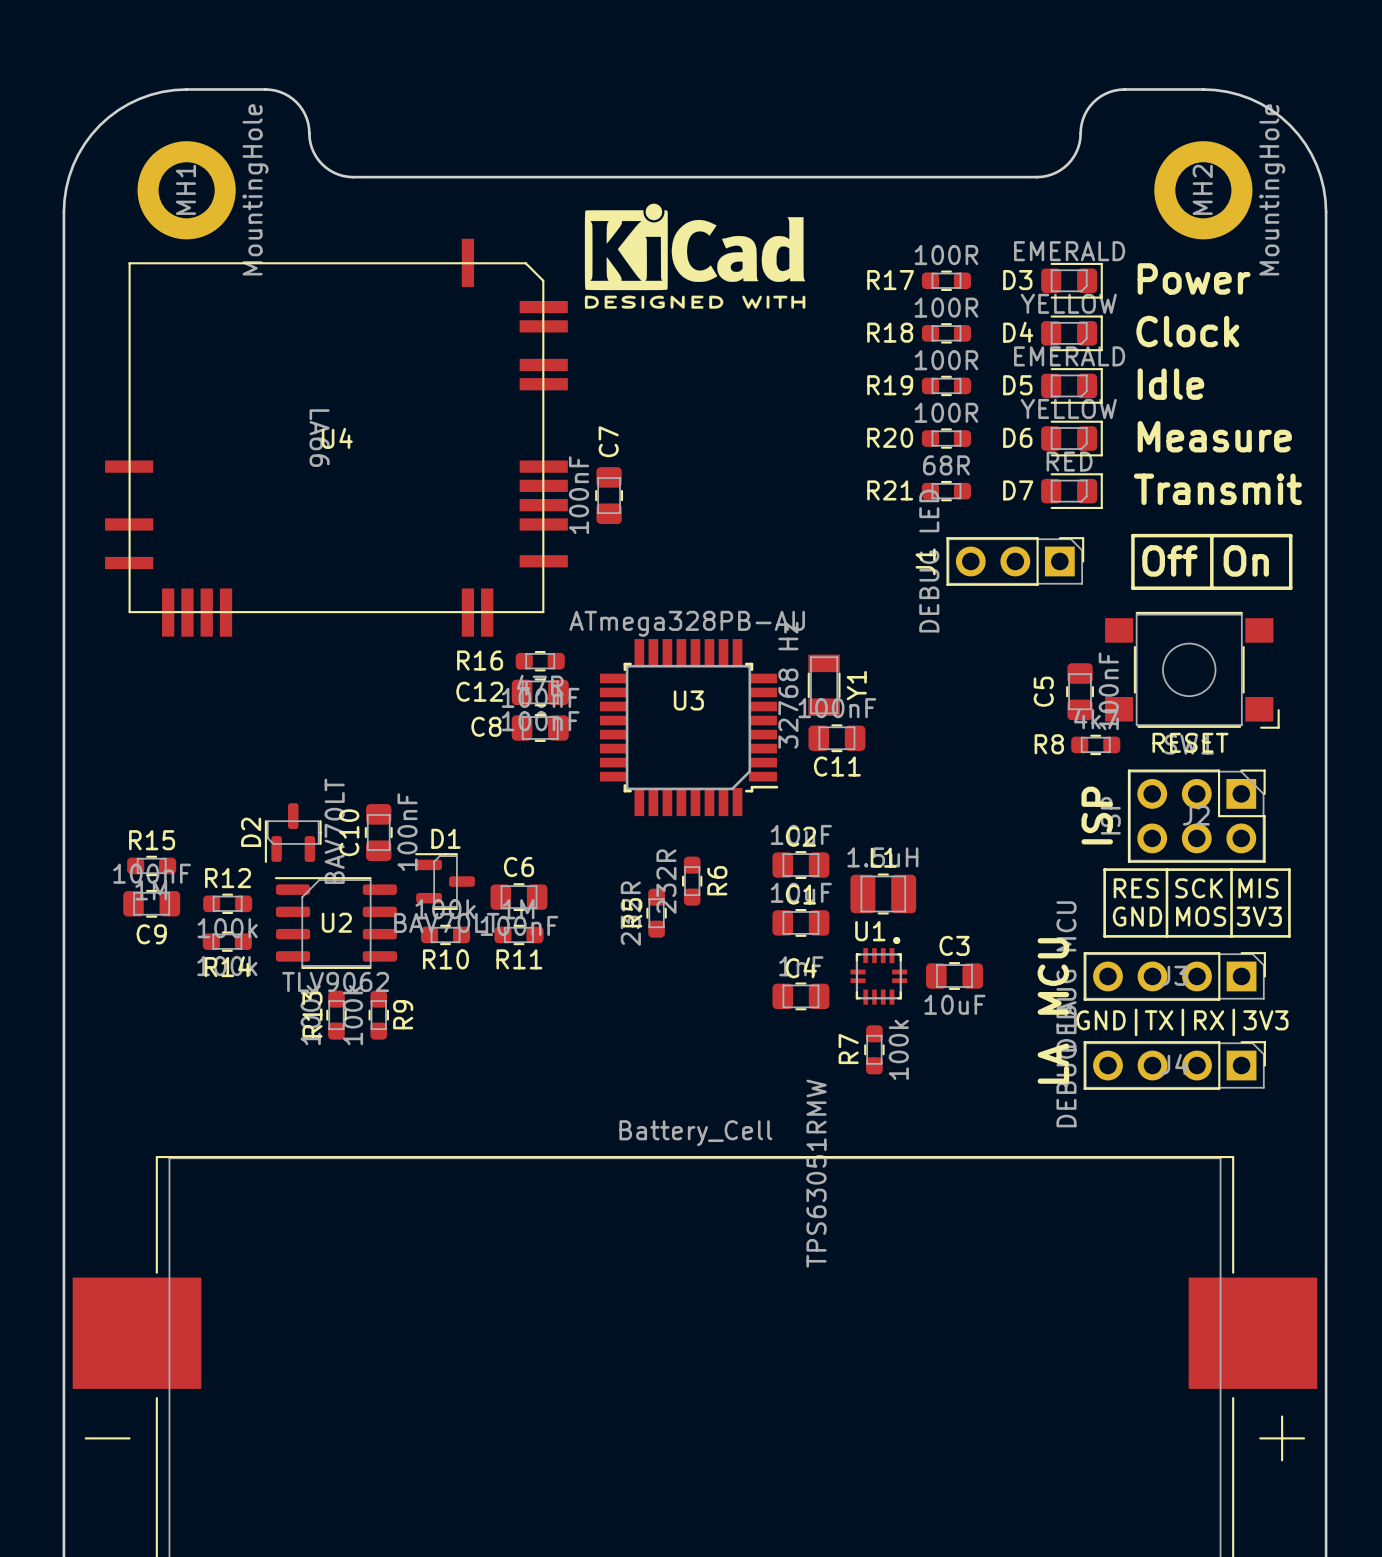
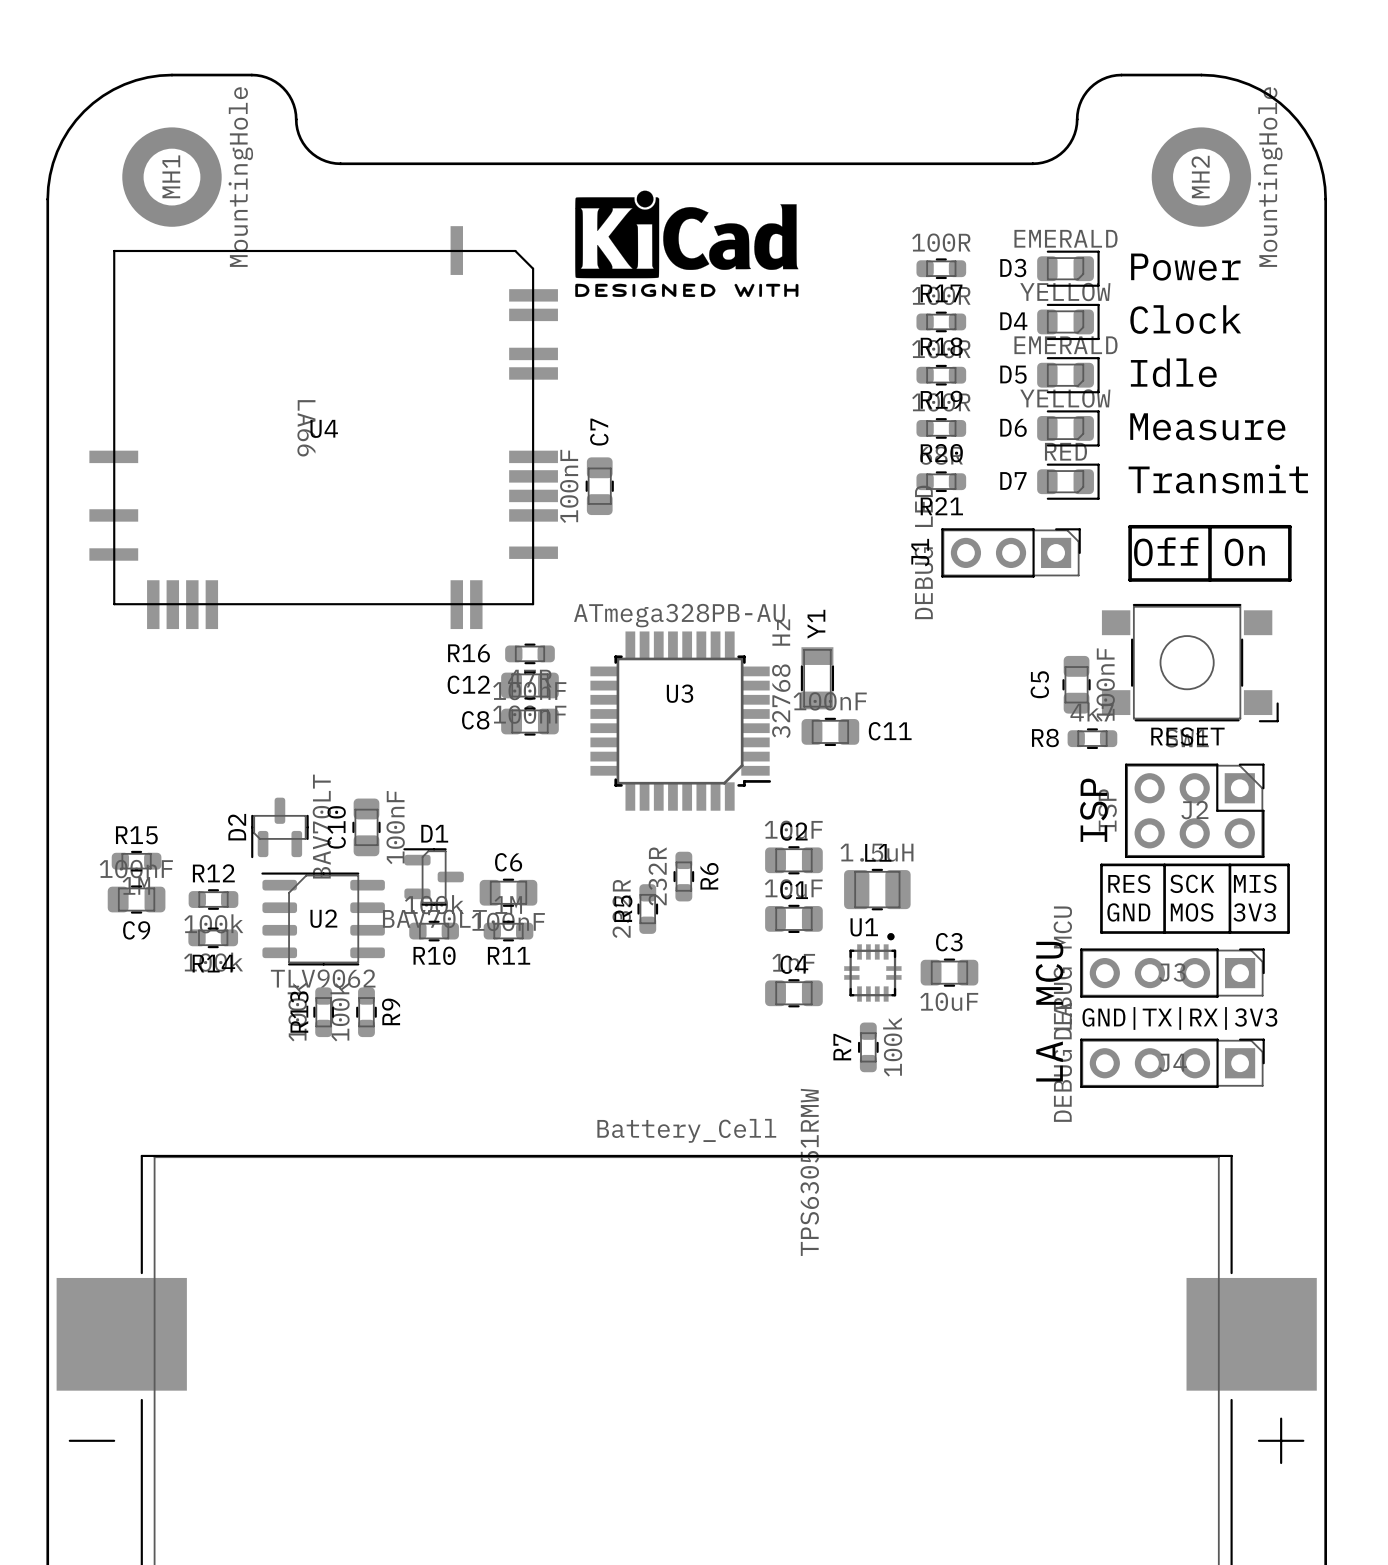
R17 name position: R17 (890, 280) -> R17 (941, 293)
R18 name position: R18 (890, 332) -> R18 (941, 346)
R19 name position: R19 (890, 385) -> R19 (941, 399)
R20 name position: R20 (890, 437) -> R20 (941, 453)
R21 name position: R21 (890, 490) -> R21 (941, 506)
Y1 name position: Y1 (856, 685) -> Y1 (816, 624)
C11 name position: C11 (837, 766) -> C11 (890, 731)

